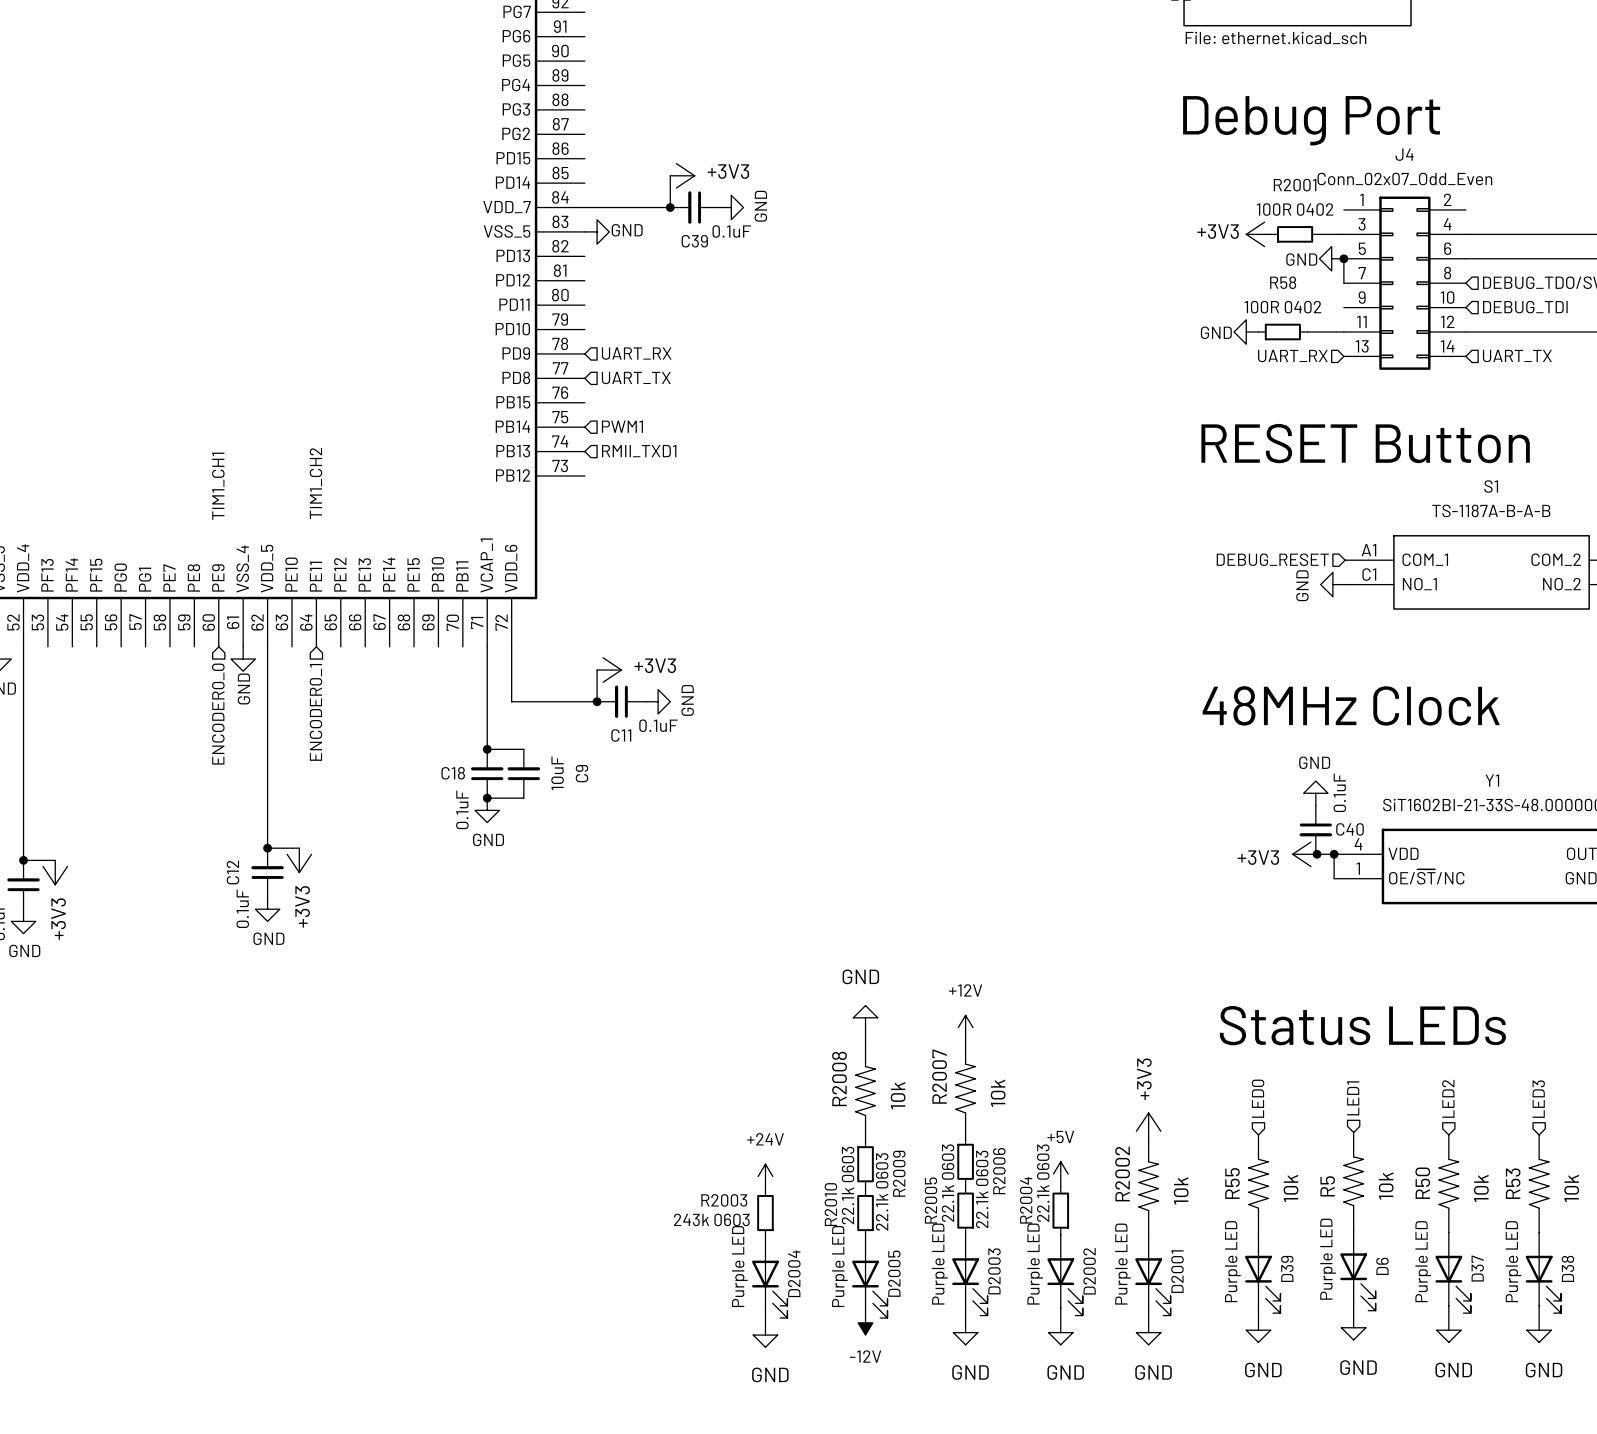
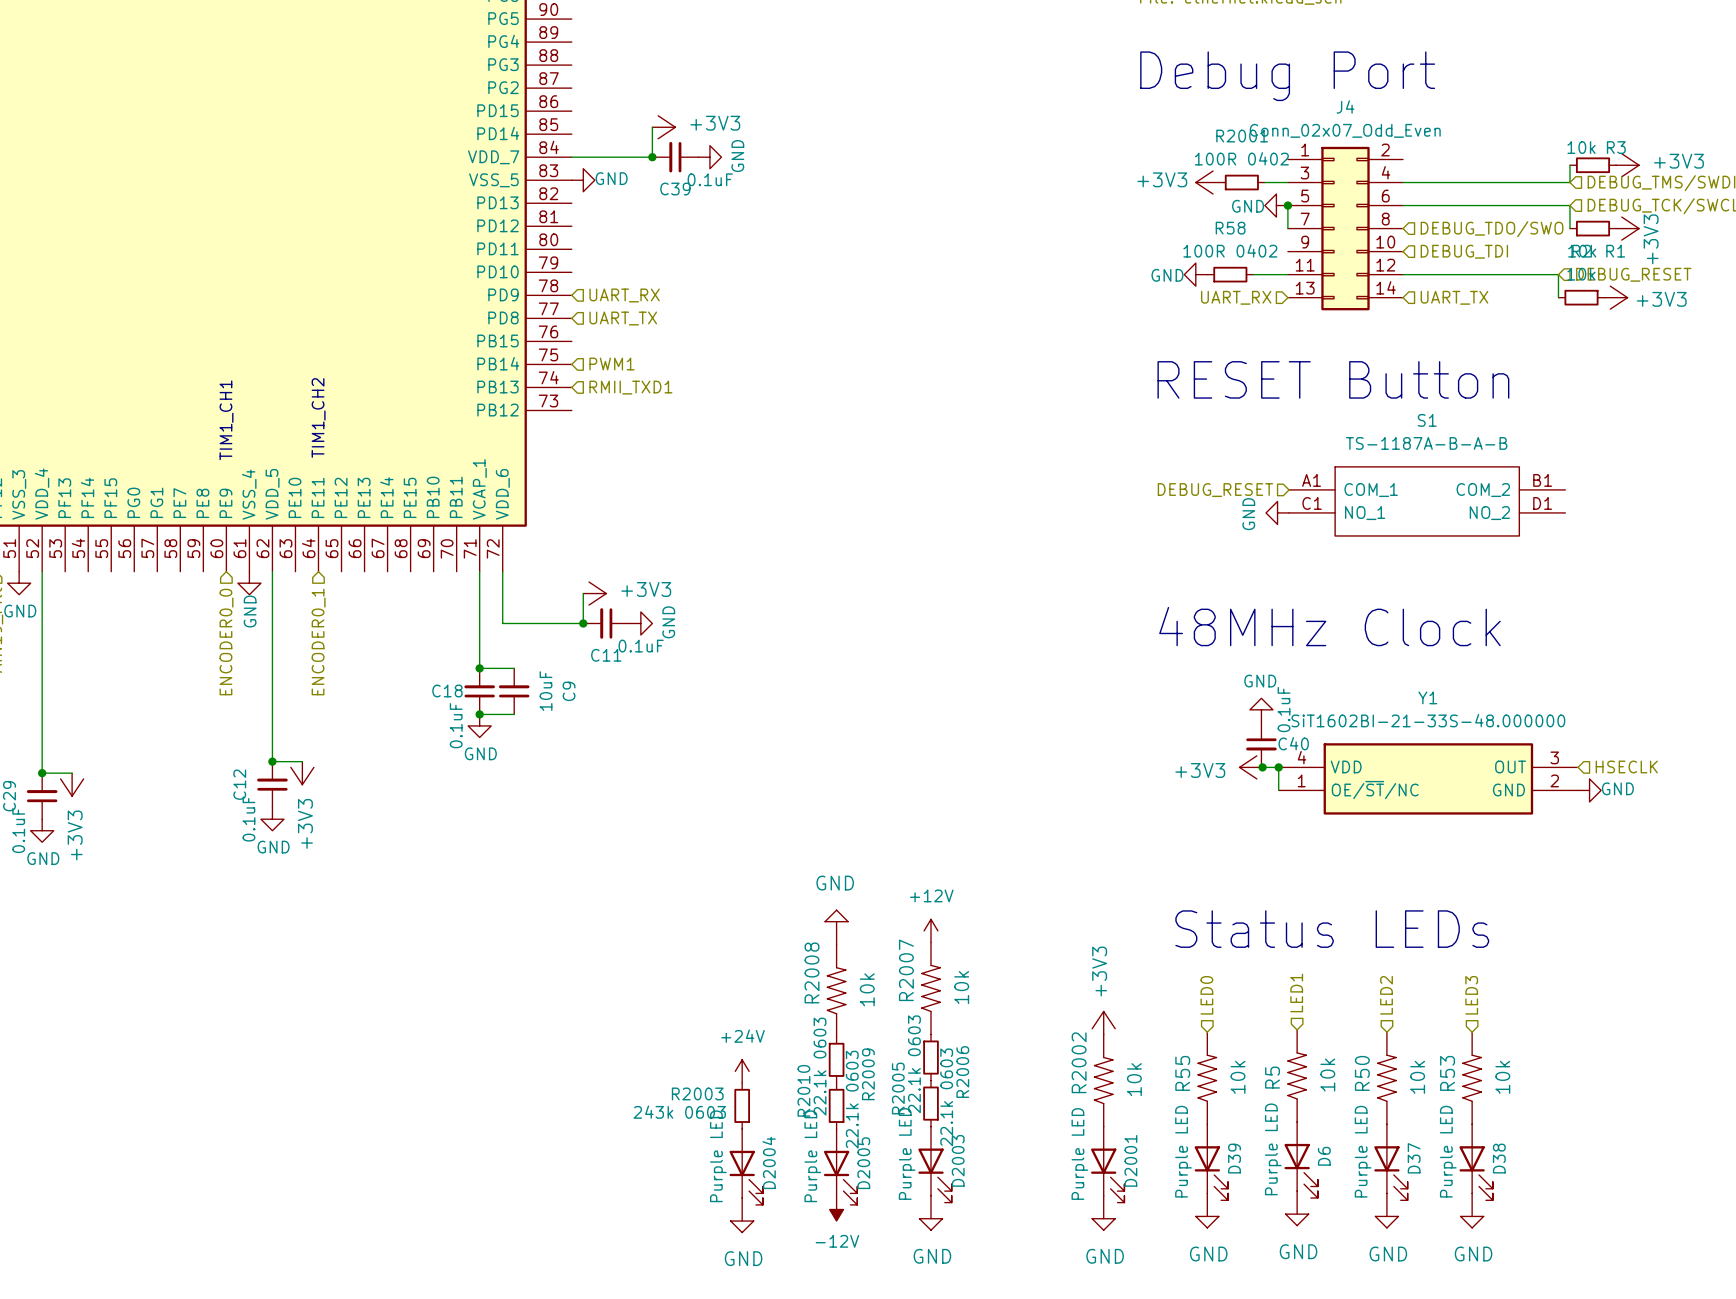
power symbol: +5V (1060, 1174) -> none
R2004: 22.1k 0603 (1060, 1210) -> none
D2002: Purple LED (1065, 1275) -> none
power symbol: GND (1060, 1326) -> none

